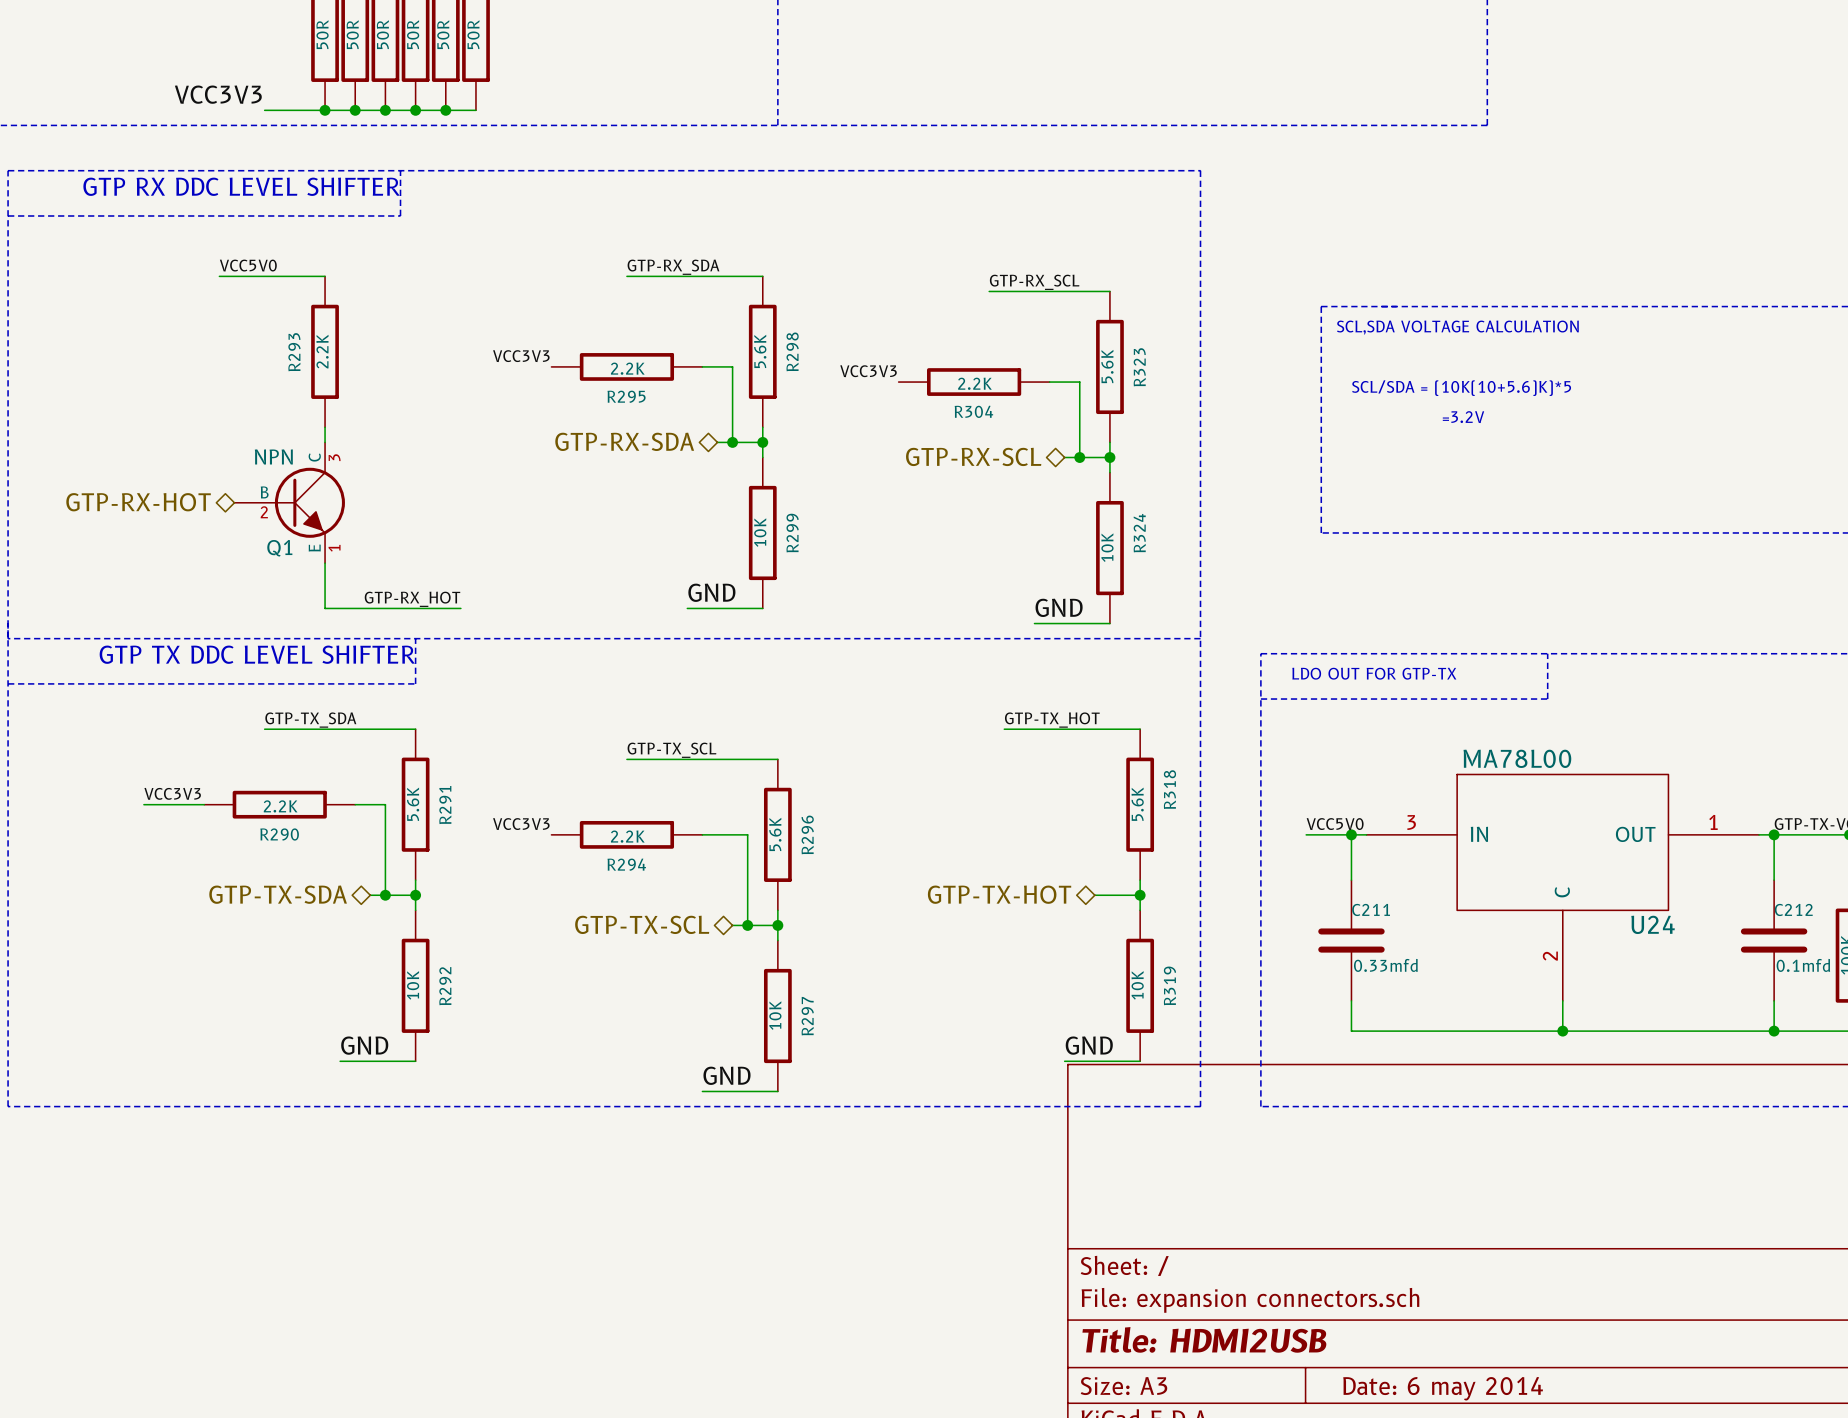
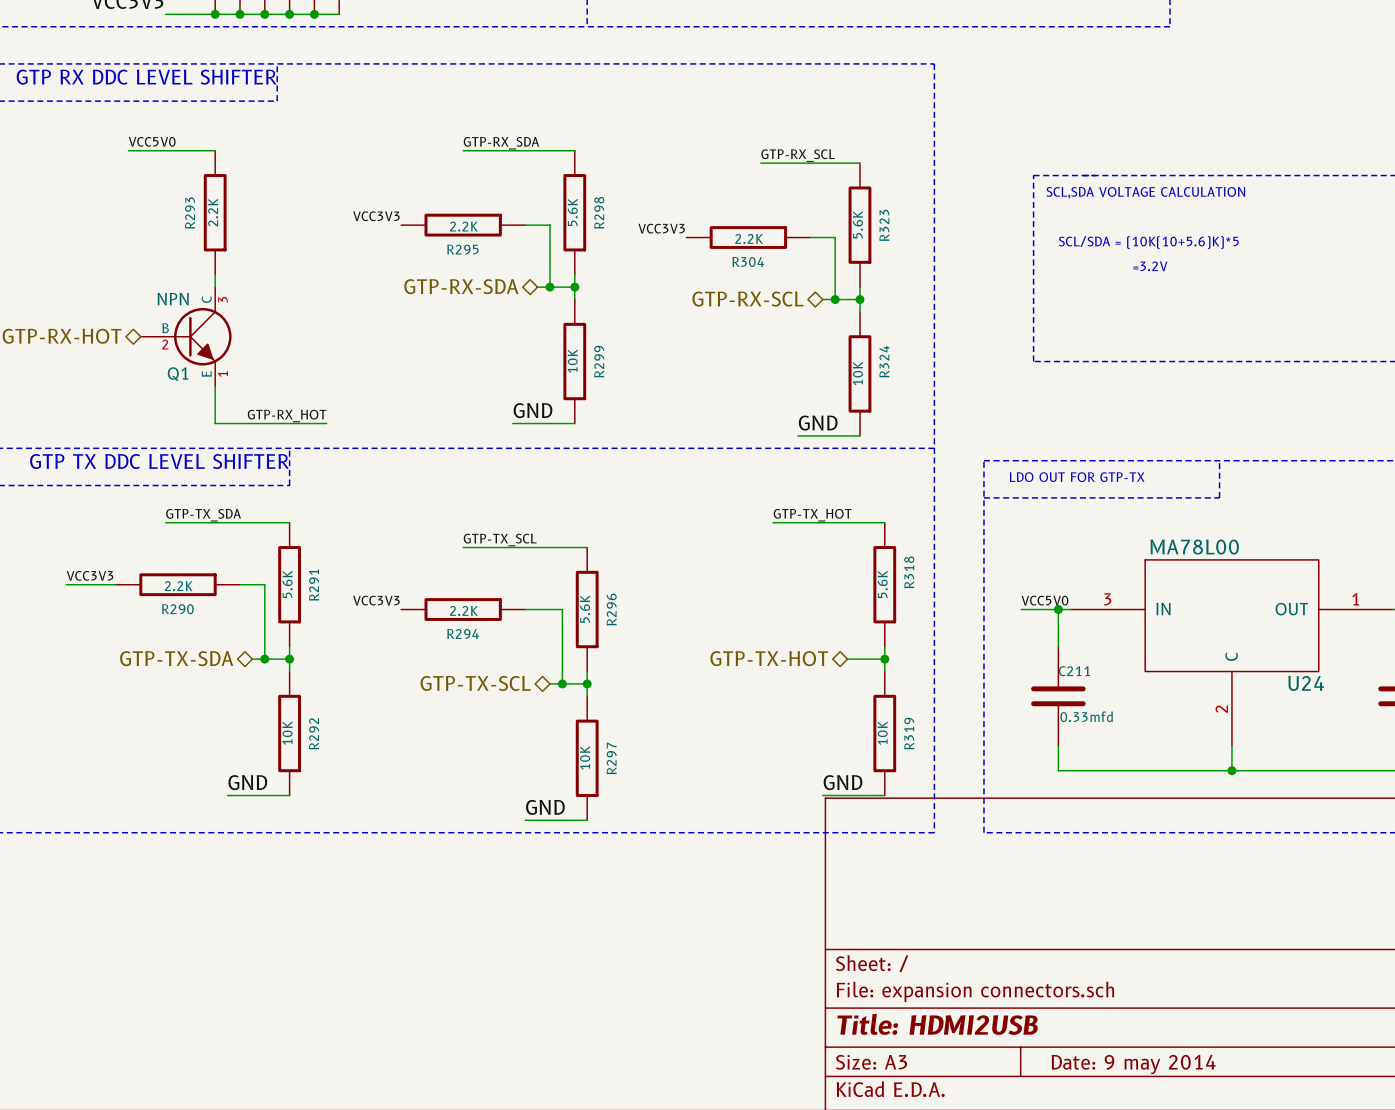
title block: Date: 6 may 2014 (1443, 1388) -> Date: 9 may 2014 (1133, 1064)

